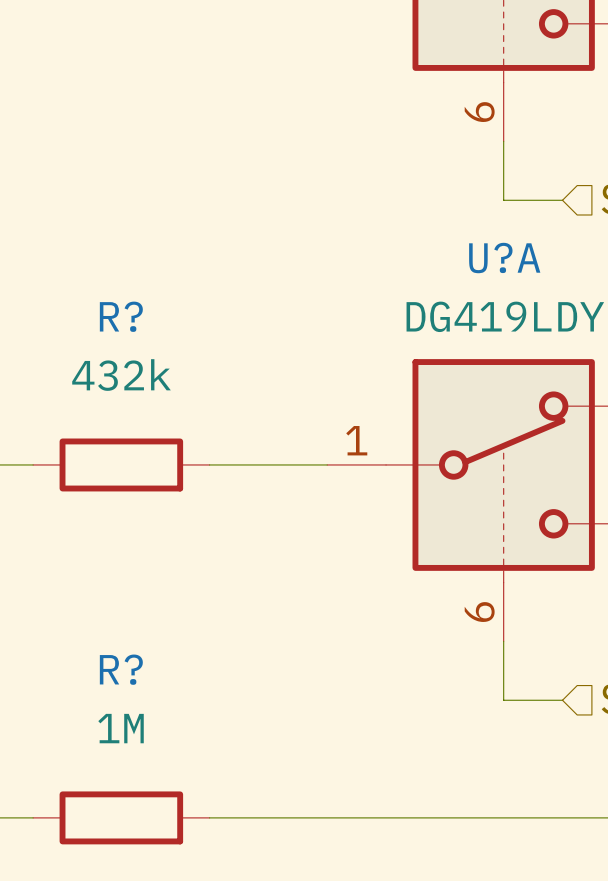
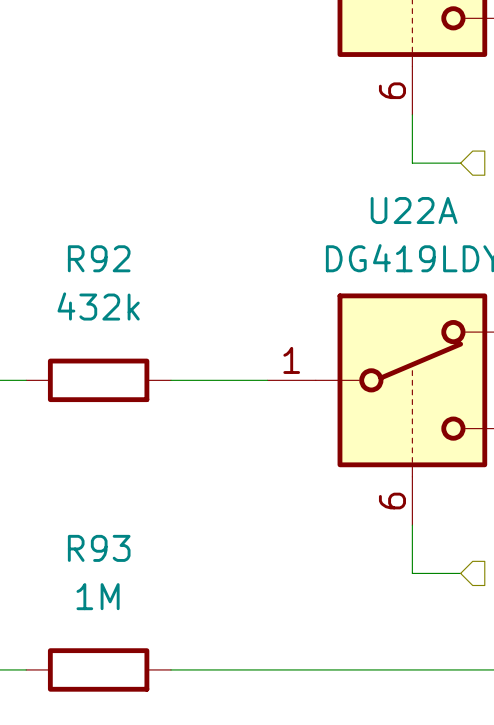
U?A name: U?A (504, 258) -> U22A (414, 210)
R? name: R? (121, 316) -> R92 (99, 258)
R? name: R? (121, 669) -> R93 (99, 548)

